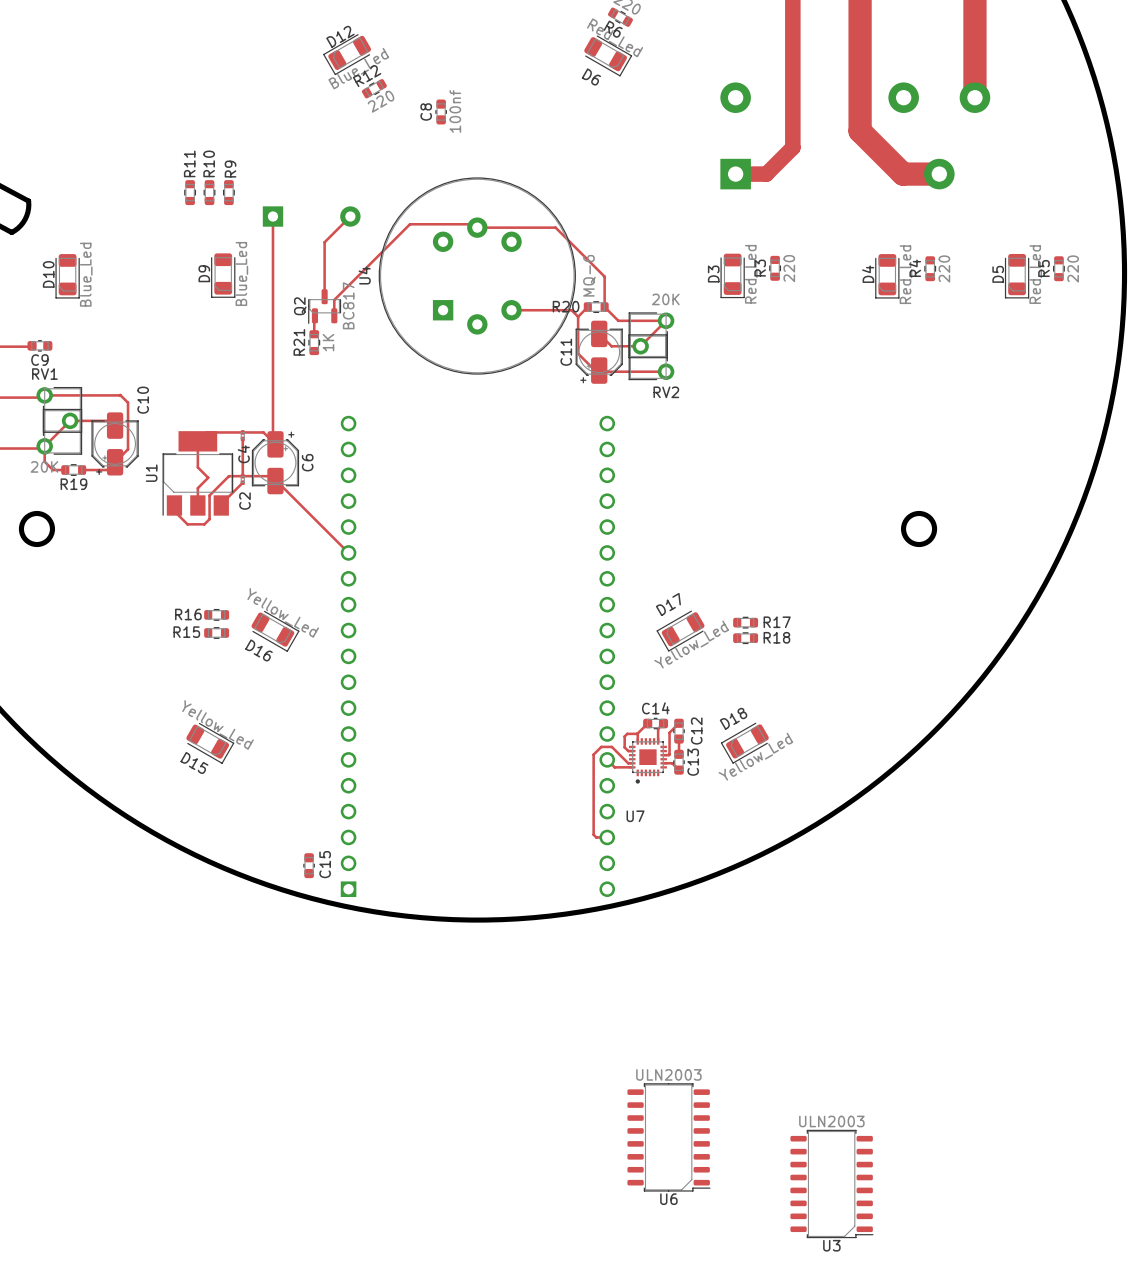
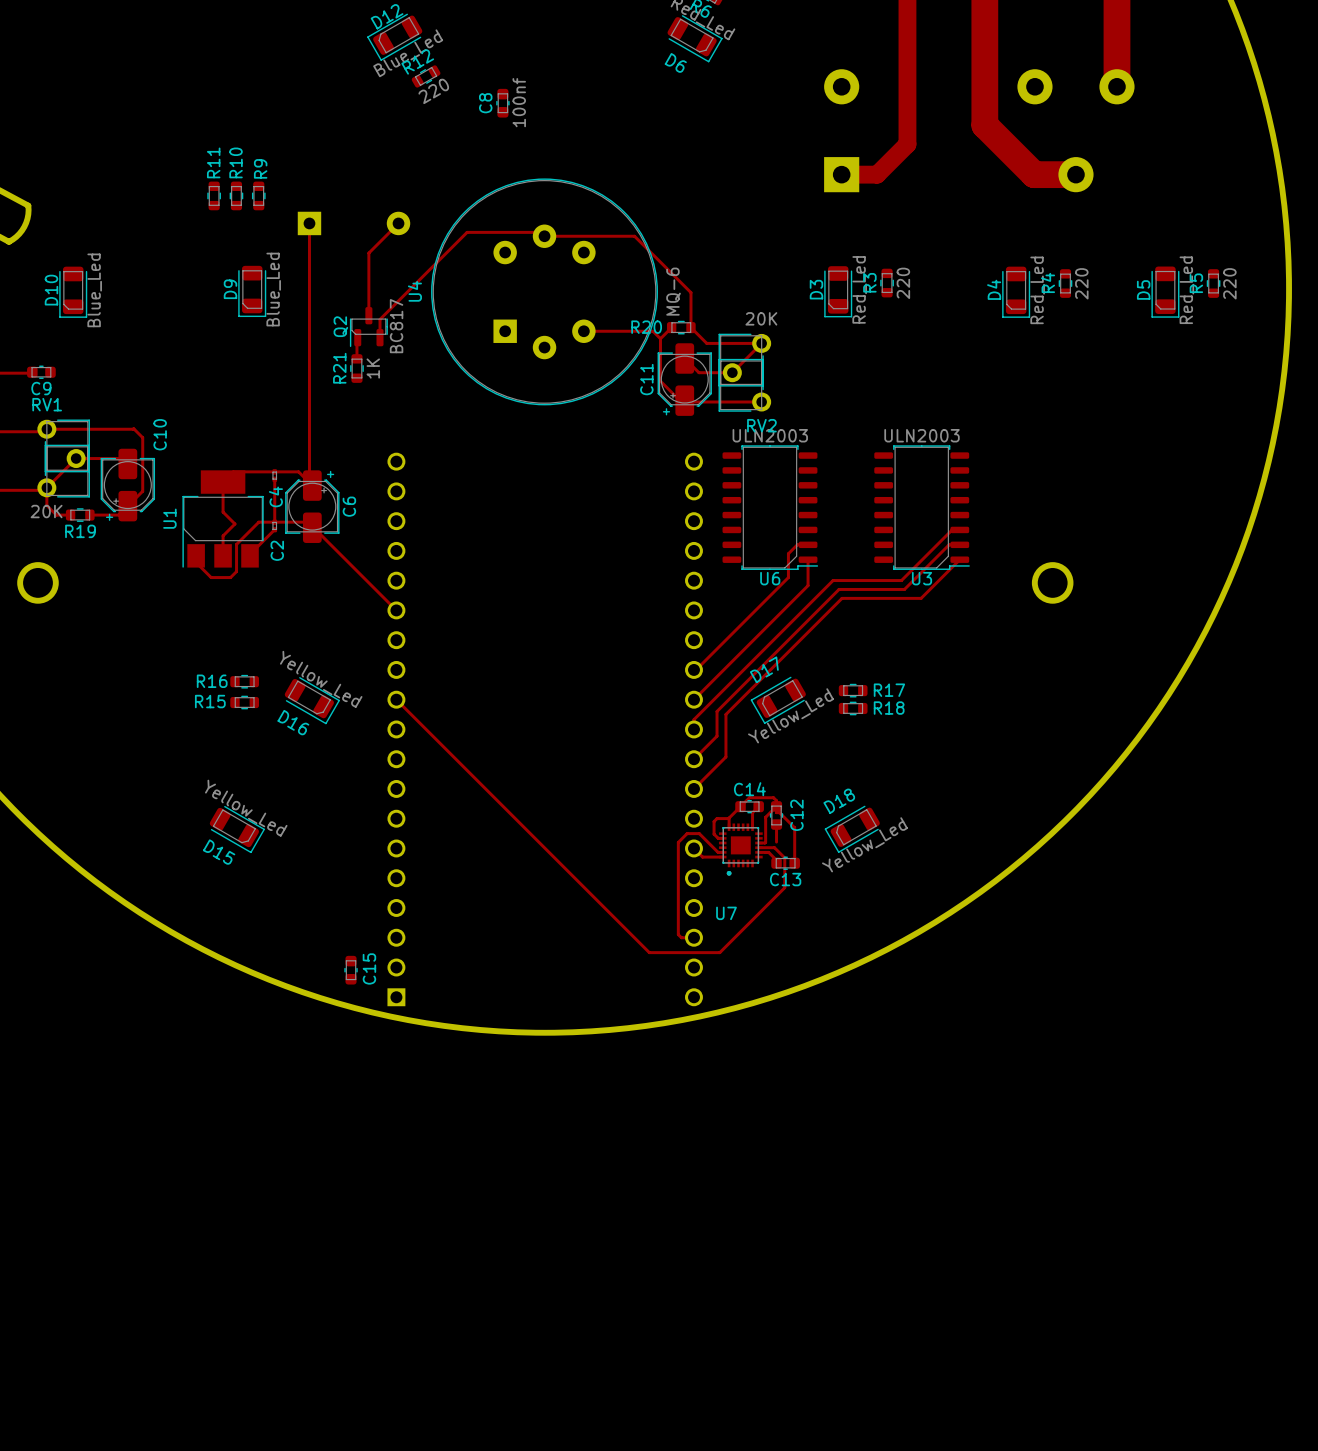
track: none -> (959, 529) (952, 529) (901, 580) (833, 580) (693, 719) (693, 729)
track: none -> (808, 544) (797, 544) (788, 553) (788, 577) (693, 669)
track: none -> (959, 544) (949, 544) (904, 589) (839, 589) (717, 711) (717, 736) (693, 759)
track: none -> (808, 559) (808, 585) (693, 699)
track: none -> (959, 559) (921, 598) (842, 598) (725, 714) (725, 757) (693, 788)
track: none -> (396, 699) (649, 952) (719, 952) (784, 887) (784, 857) (774, 847) (758, 847)
track: none -> (740, 806) (749, 797) (773, 797) (776, 800) (776, 812) (779, 812) (794, 827) (794, 863)
C13 rotation: 0° (679, 762) -> 90° clockwise (785, 863)
U6 position: (668, 1137) -> (770, 507)
U3 position: (831, 1183) -> (922, 507)

